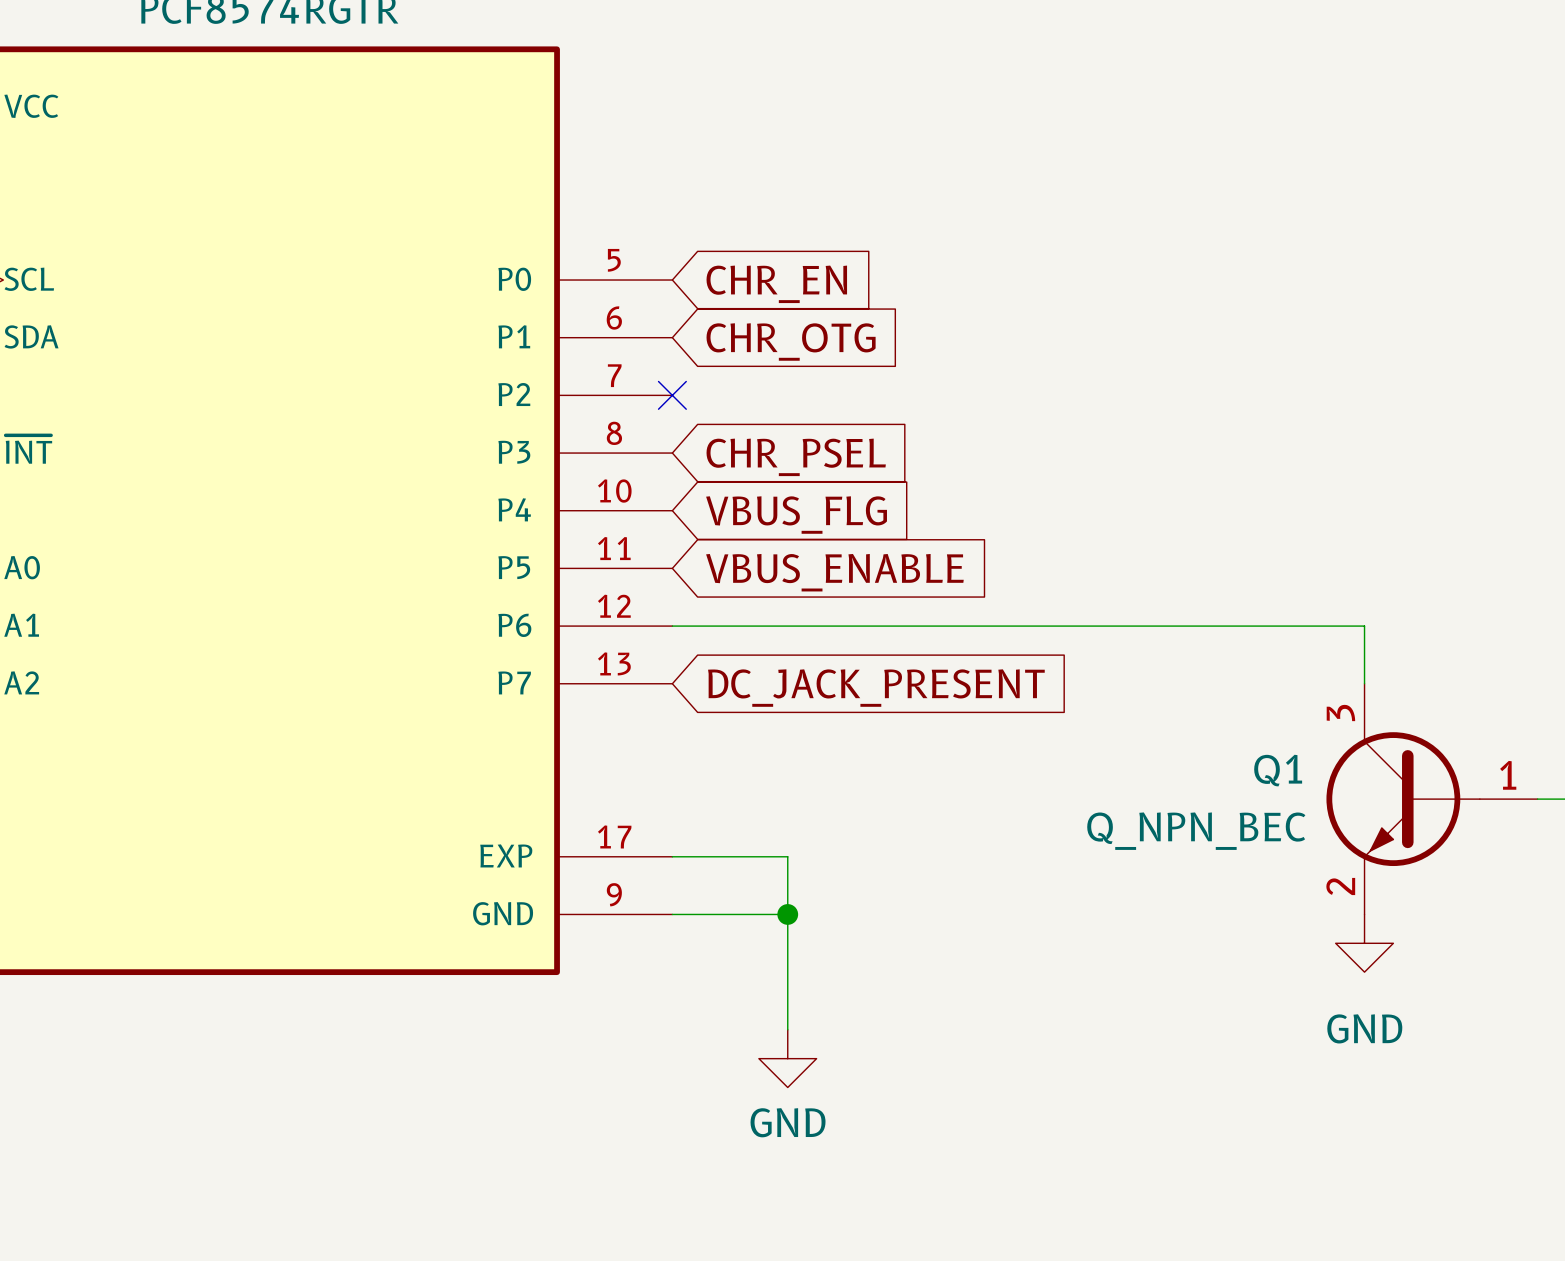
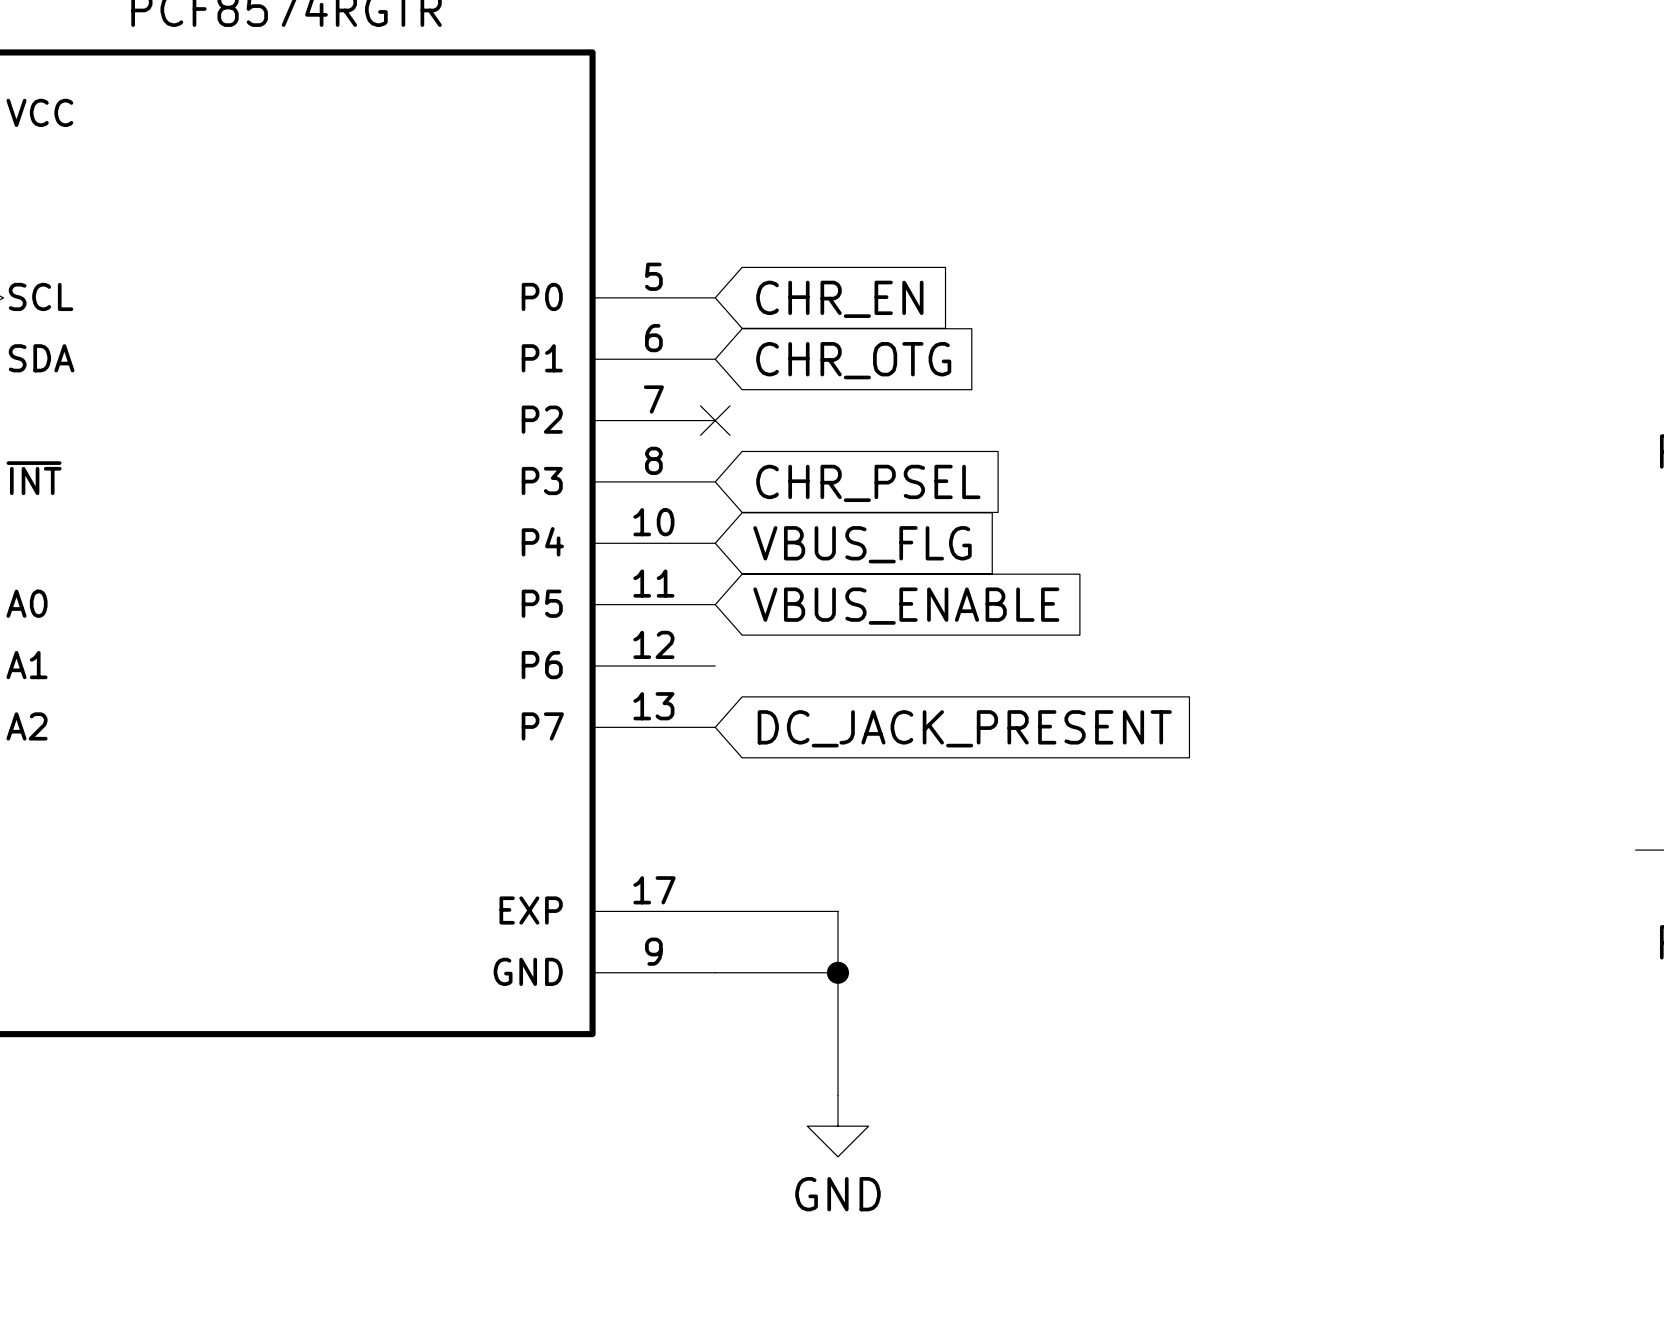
wire: (672, 626) (1364, 626) (1364, 683) -> none
Q1: Q_NPN_BEC (1432, 799) -> none
power symbol: GND (1364, 943) -> none

